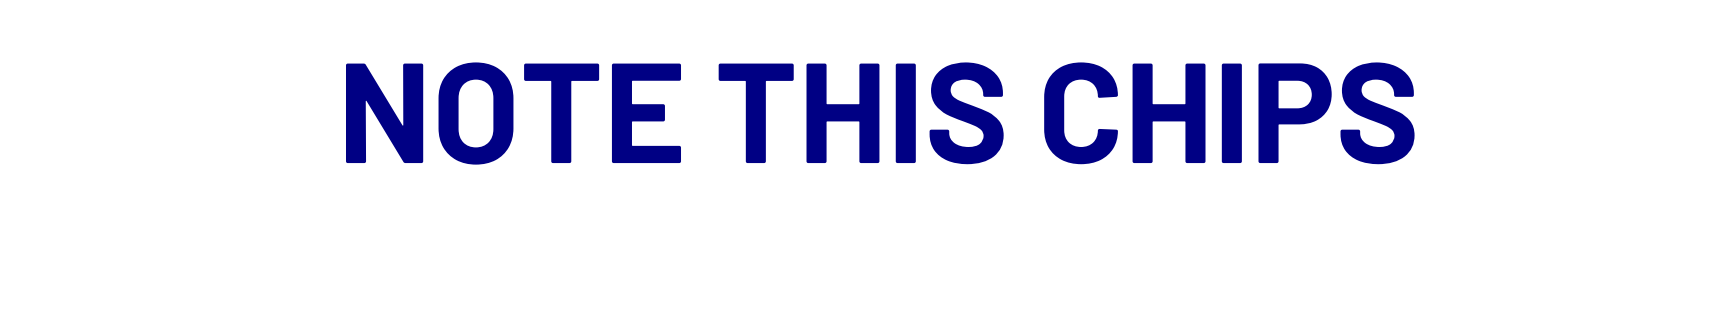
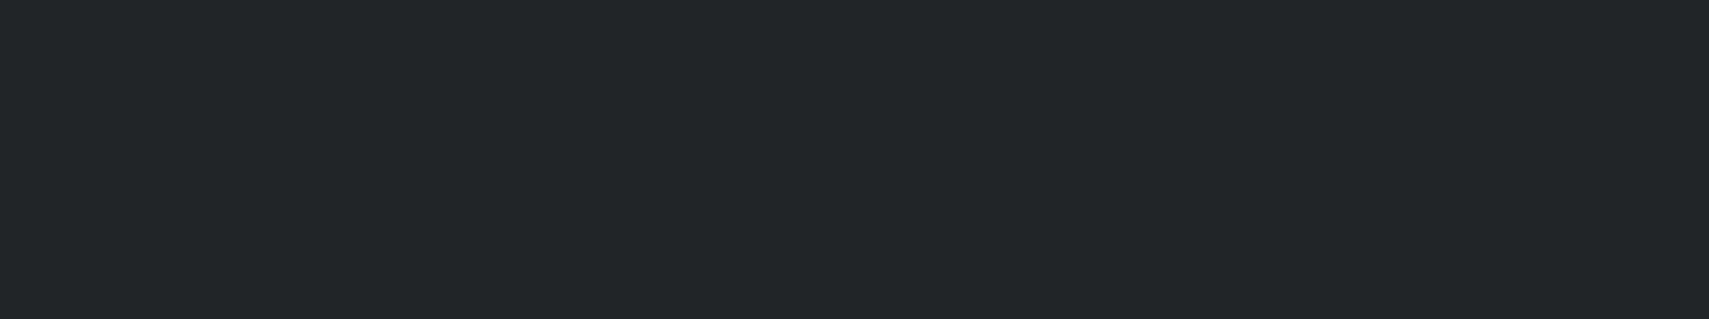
text: NOTE THIS CHIPS (880, 113) -> none

